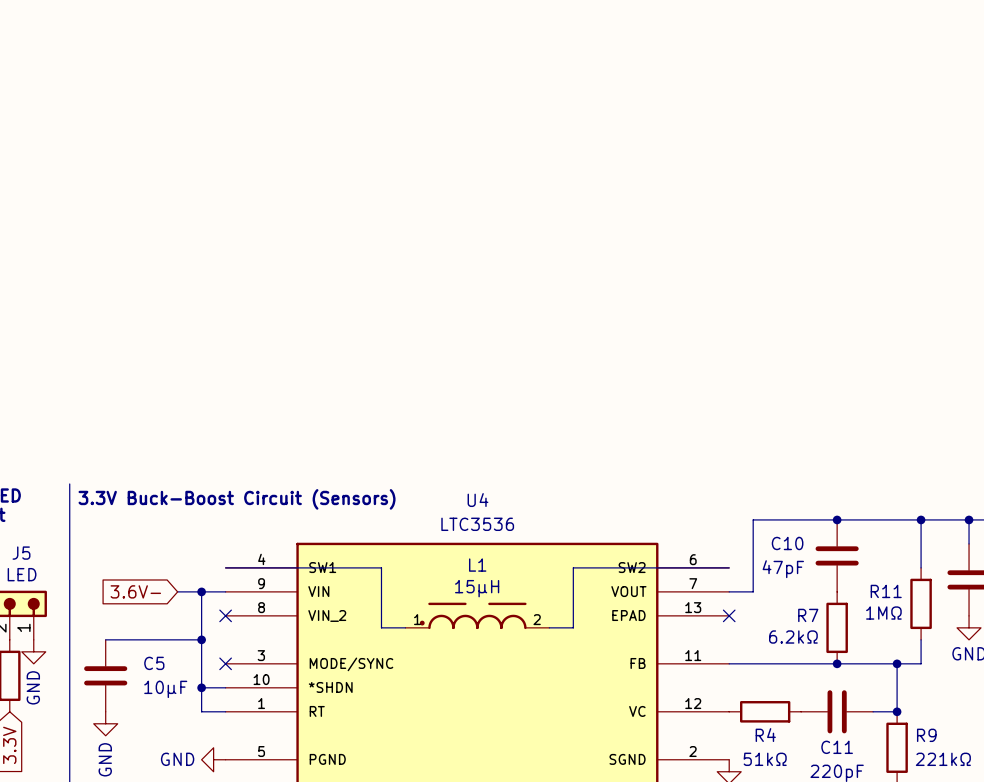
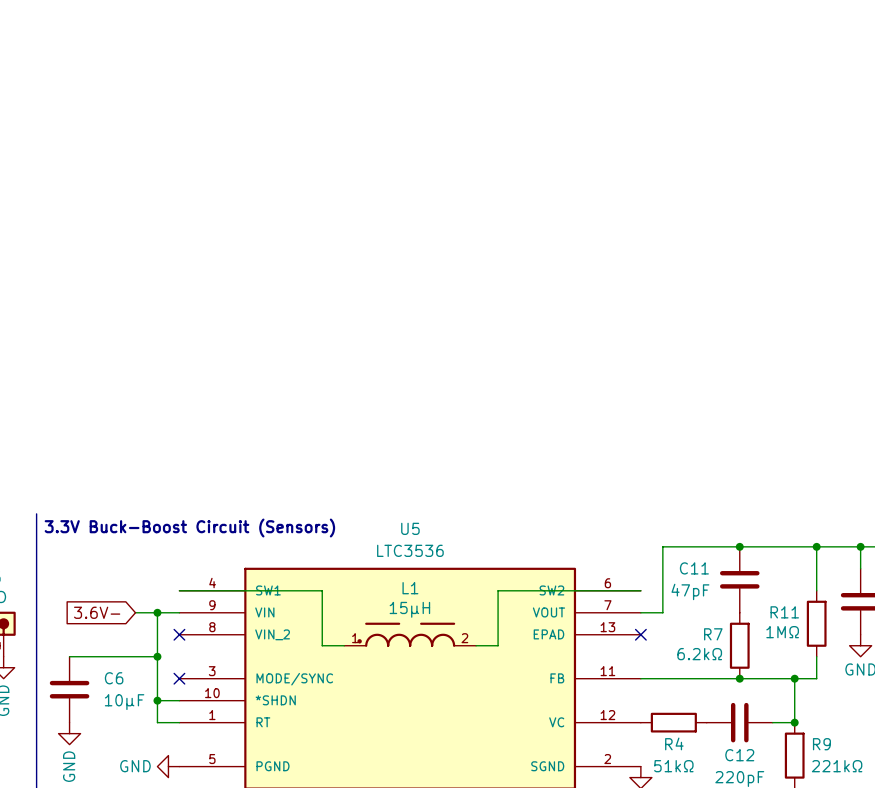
U4 name: U4 (477, 500) -> U5 (410, 528)
C10 name: C10 (787, 543) -> C11 (694, 568)
C5 name: C5 (154, 663) -> C6 (114, 678)
C11 name: C11 (837, 747) -> C12 (739, 755)

